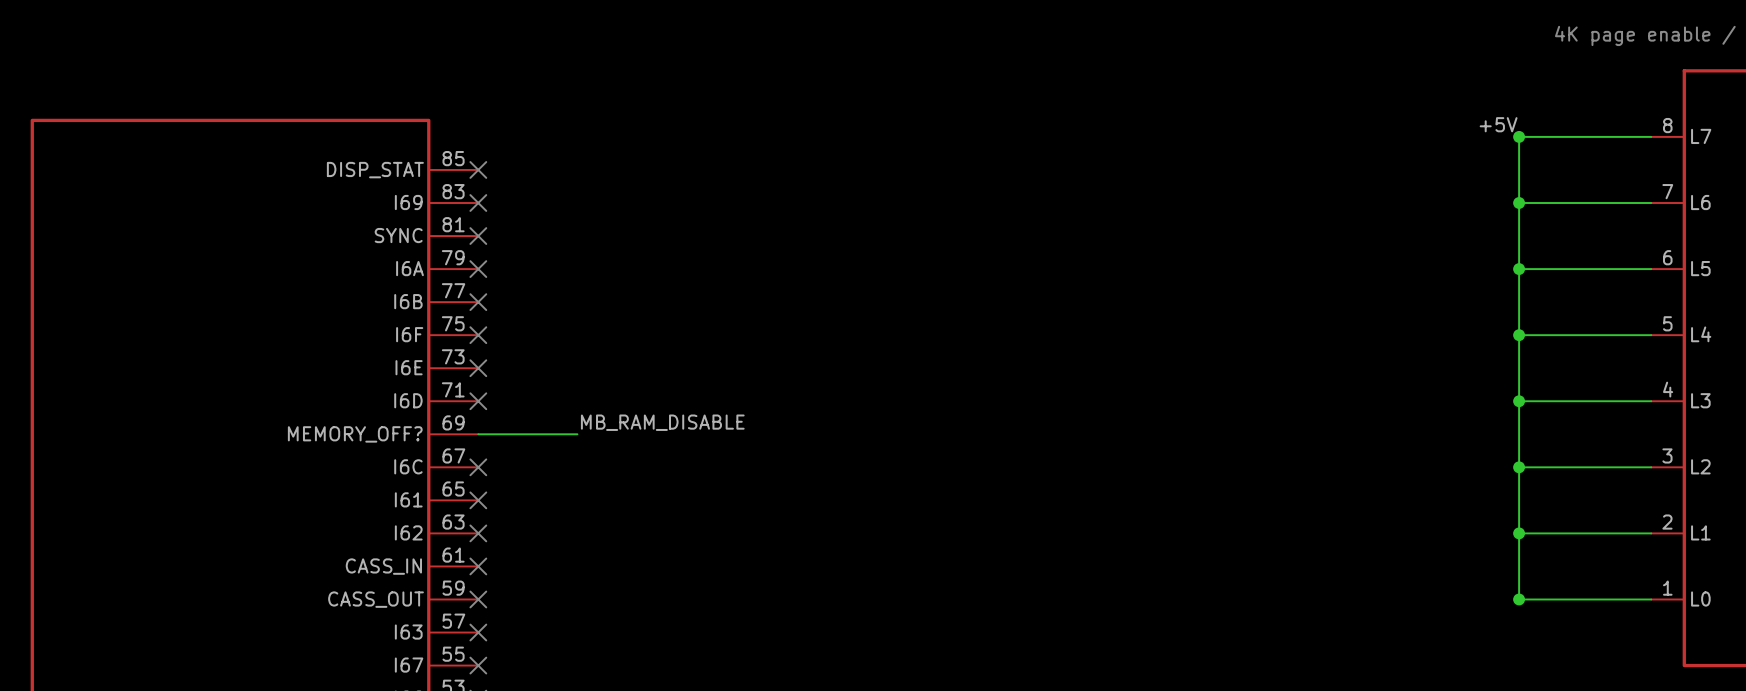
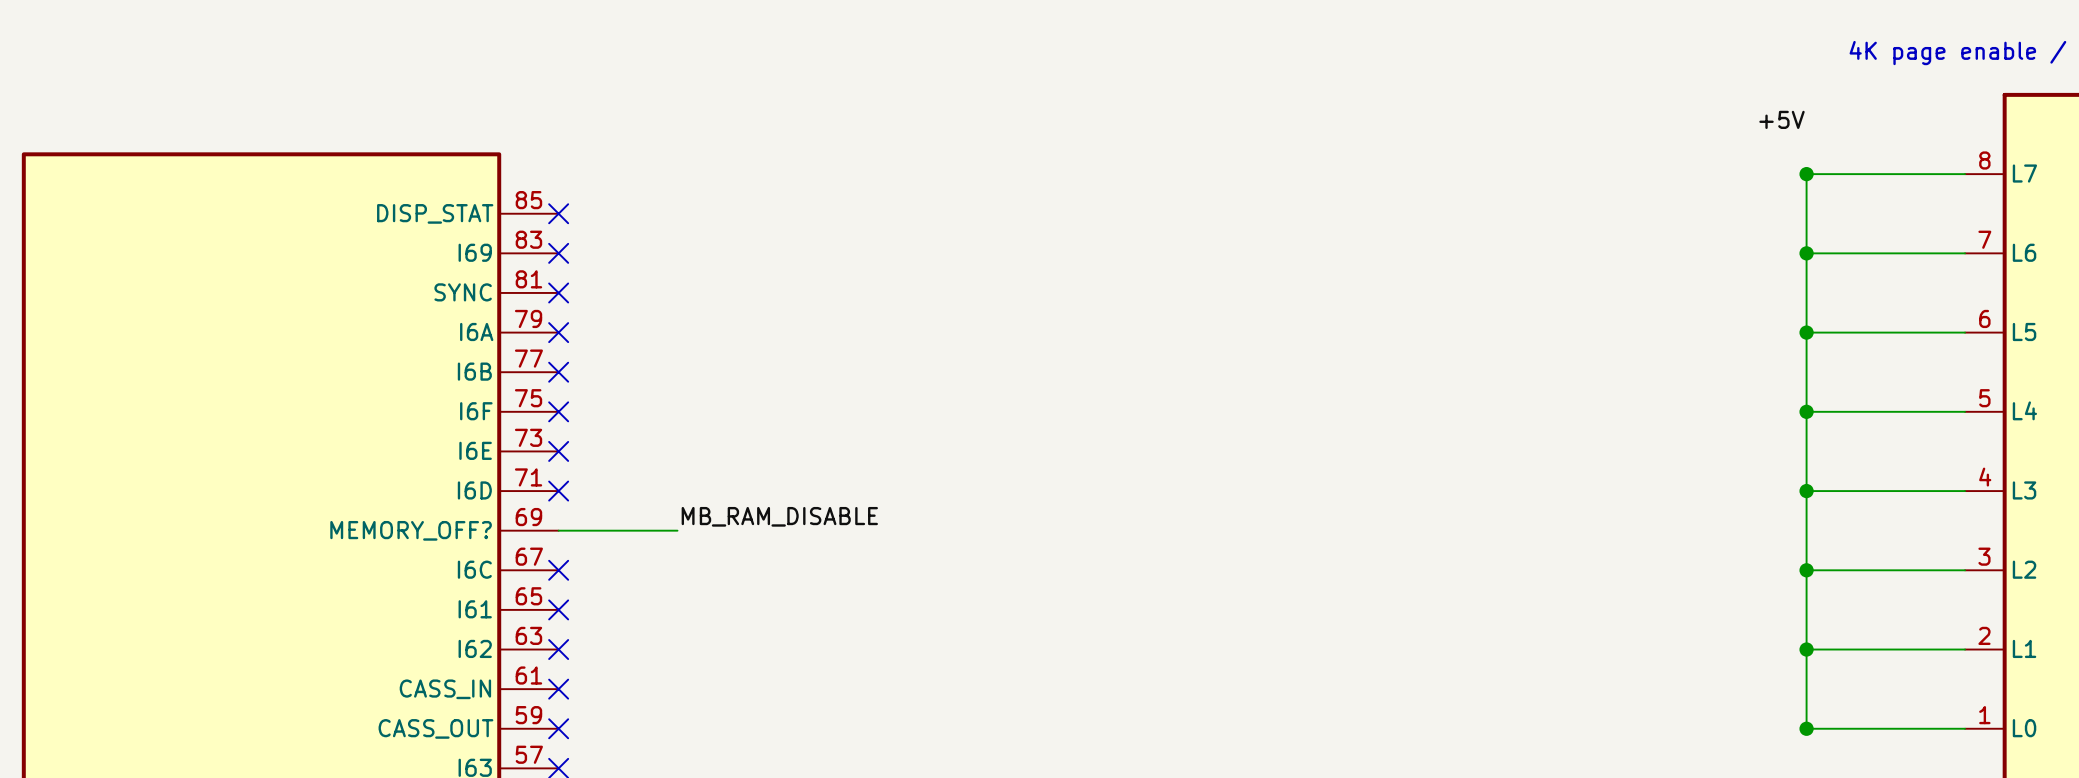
label position: +5V (1498, 124) -> +5V (1781, 119)

